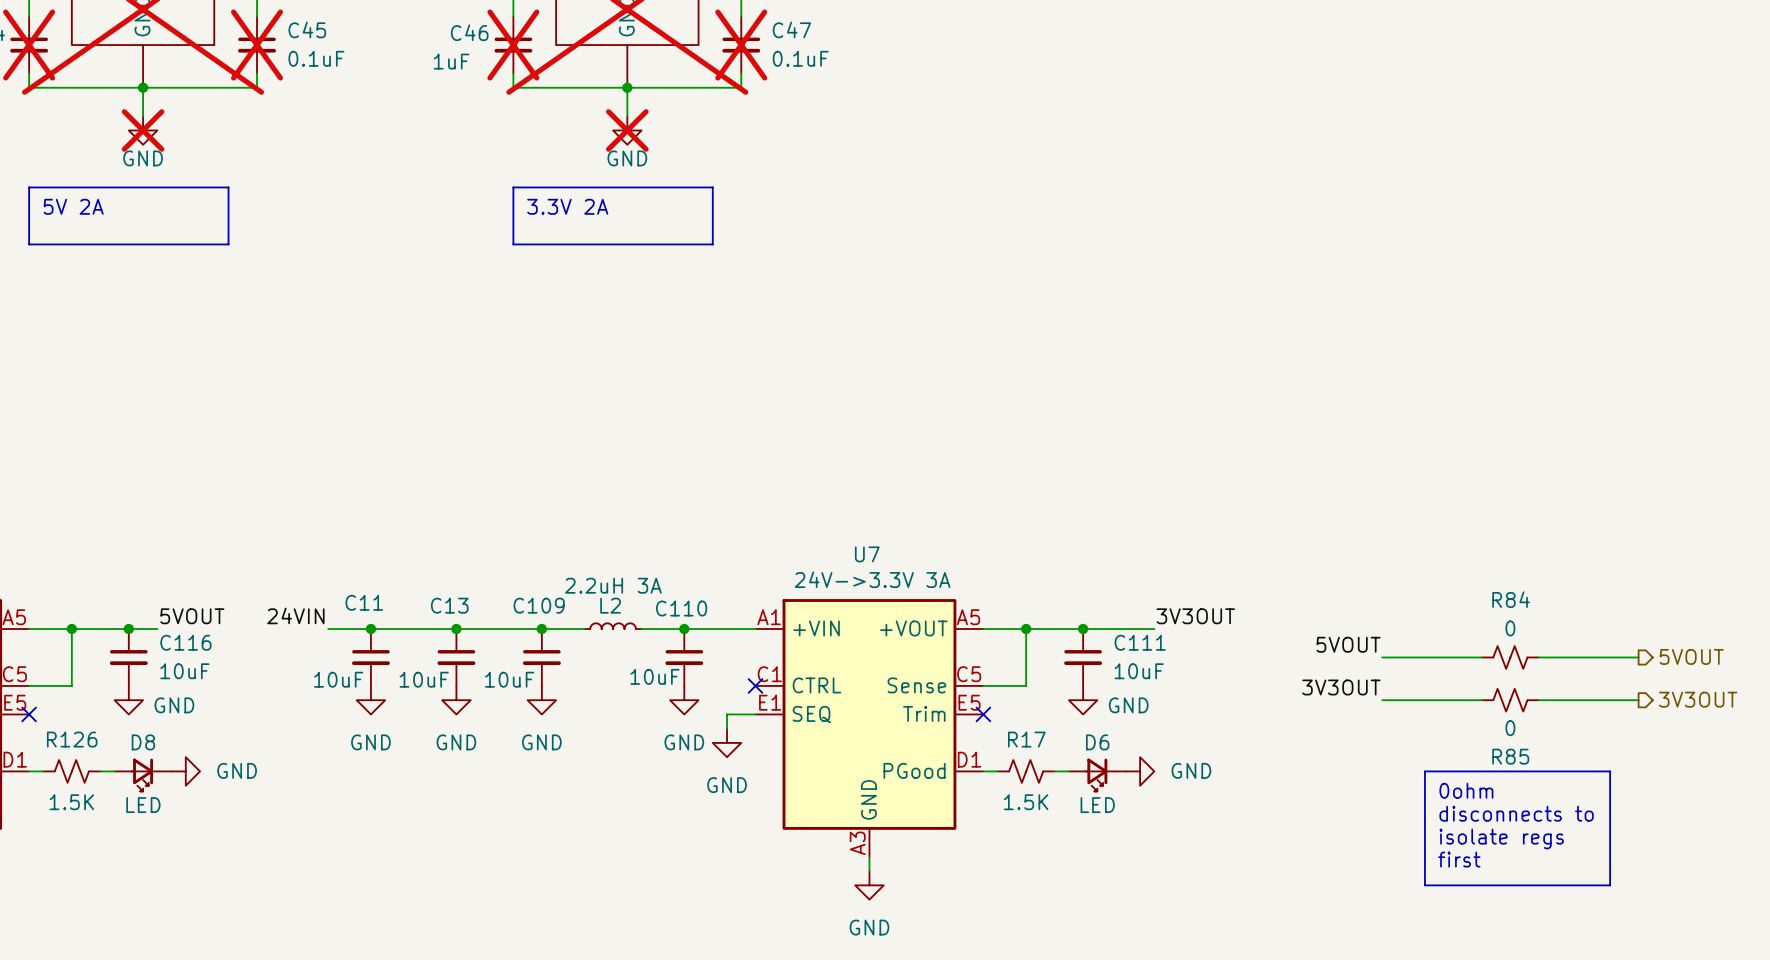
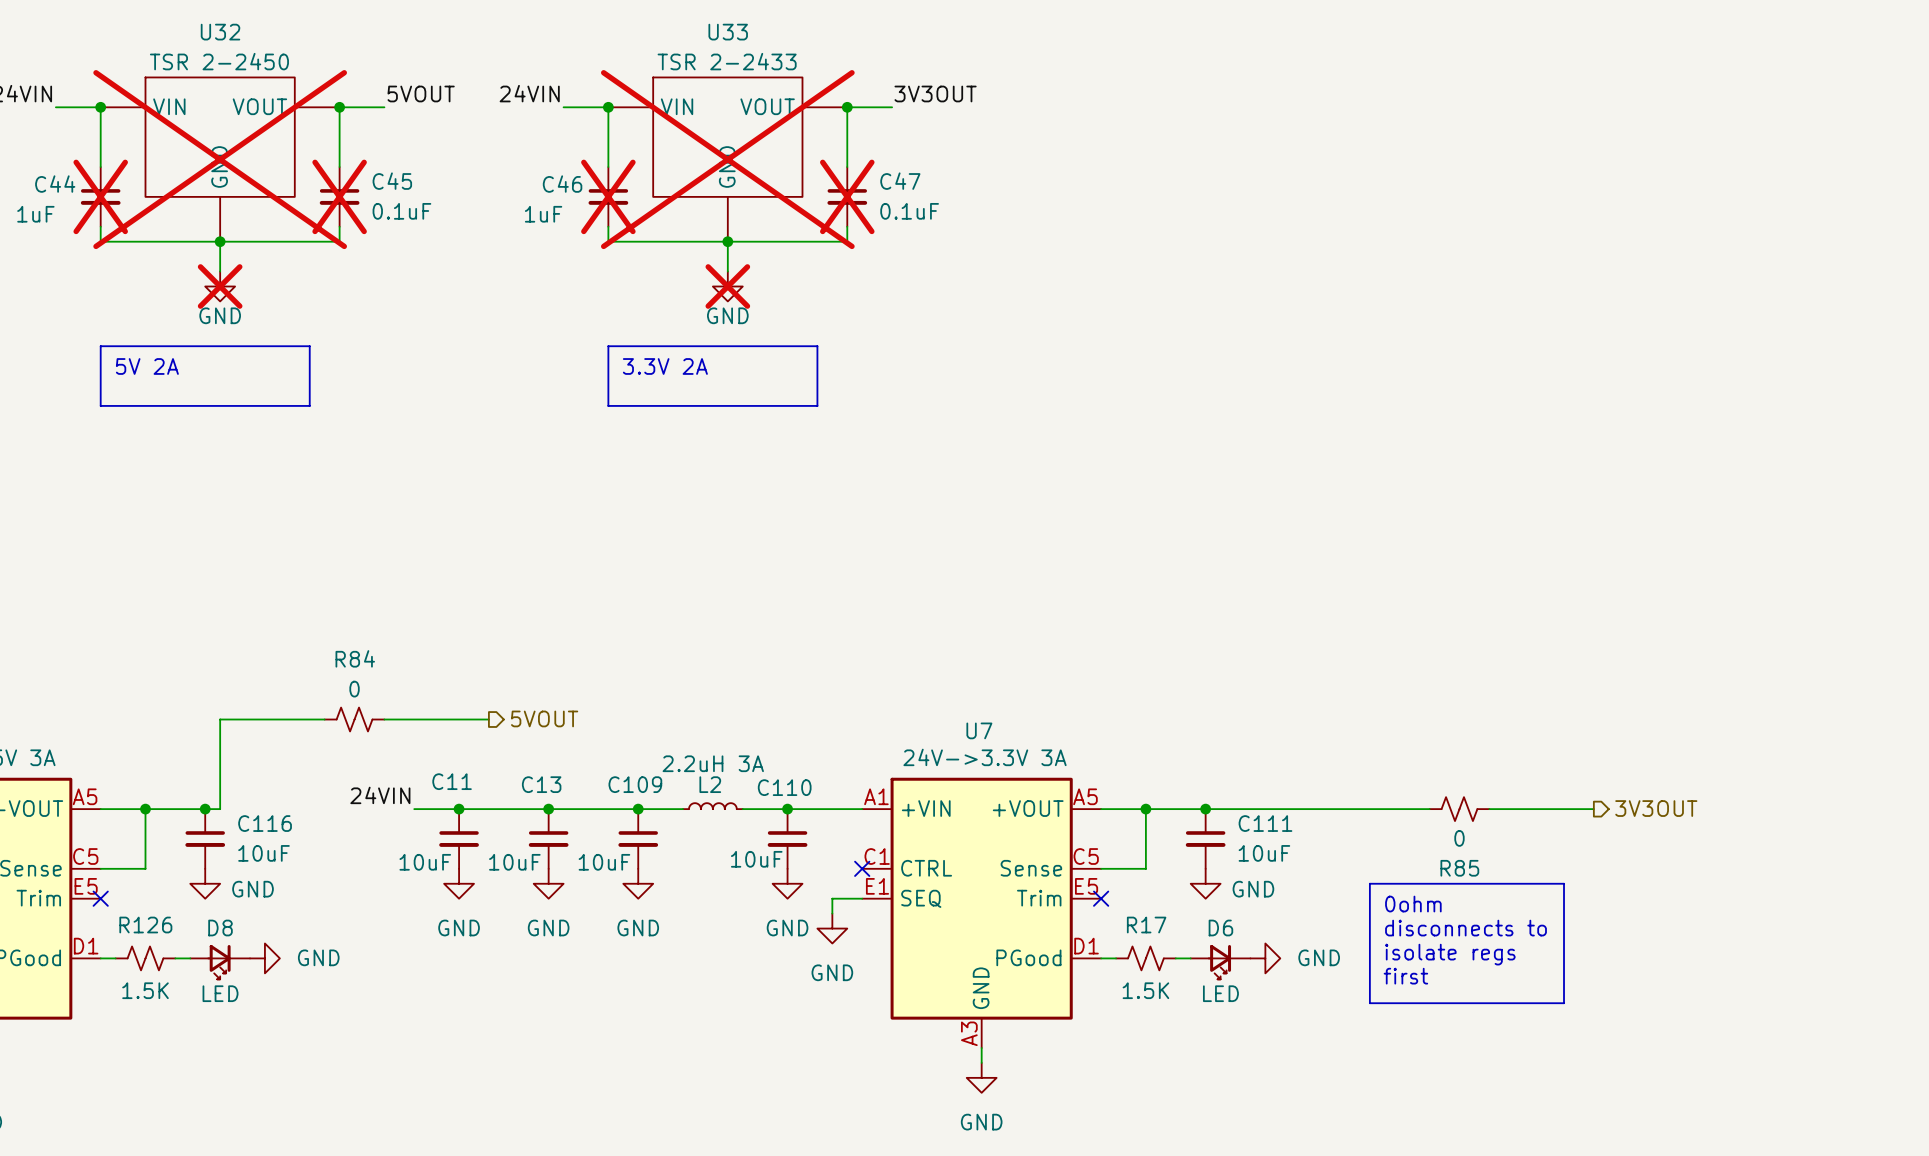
wire: none -> (384, 719) (488, 719)
hierarchical label: none -> 5VOUT (544, 718)
label: 5VOUT (192, 616) -> none
label: 3V3OUT (1195, 616) -> none
wire: (143, 628) (157, 628) -> (220, 809) (220, 719) (324, 719)
wire: none -> (1280, 809) (1429, 809)
label: 5VOUT (1348, 644) -> none
hierarchical label: 5VOUT (1691, 656) -> none
wire: (1382, 657) (1481, 657) -> (1489, 809) (1593, 809)
R84 position: (1510, 657) -> (354, 719)
wire: (1538, 657) (1638, 657) -> none
label: 3V3OUT (1341, 687) -> none
hierarchical label position: 3V3OUT (1698, 699) -> 3V3OUT (1656, 808)
wire: (1382, 700) (1481, 700) -> none
R85 position: (1510, 700) -> (1459, 809)
wire: (1538, 700) (1638, 700) -> none
line: (1424, 771) (1610, 771) (1610, 885) (1424, 885) (1424, 814) -> (1564, 958) (1564, 883) (1369, 883) (1369, 1003) (1564, 1003)
text position: 0ohm (1466, 790) -> 0ohm (1413, 904)
text position: disconnects to (1516, 813) -> disconnects to (1466, 928)
text position: isolate regs (1501, 839) -> isolate regs (1450, 954)
text position: first (1459, 859) -> first (1405, 976)

